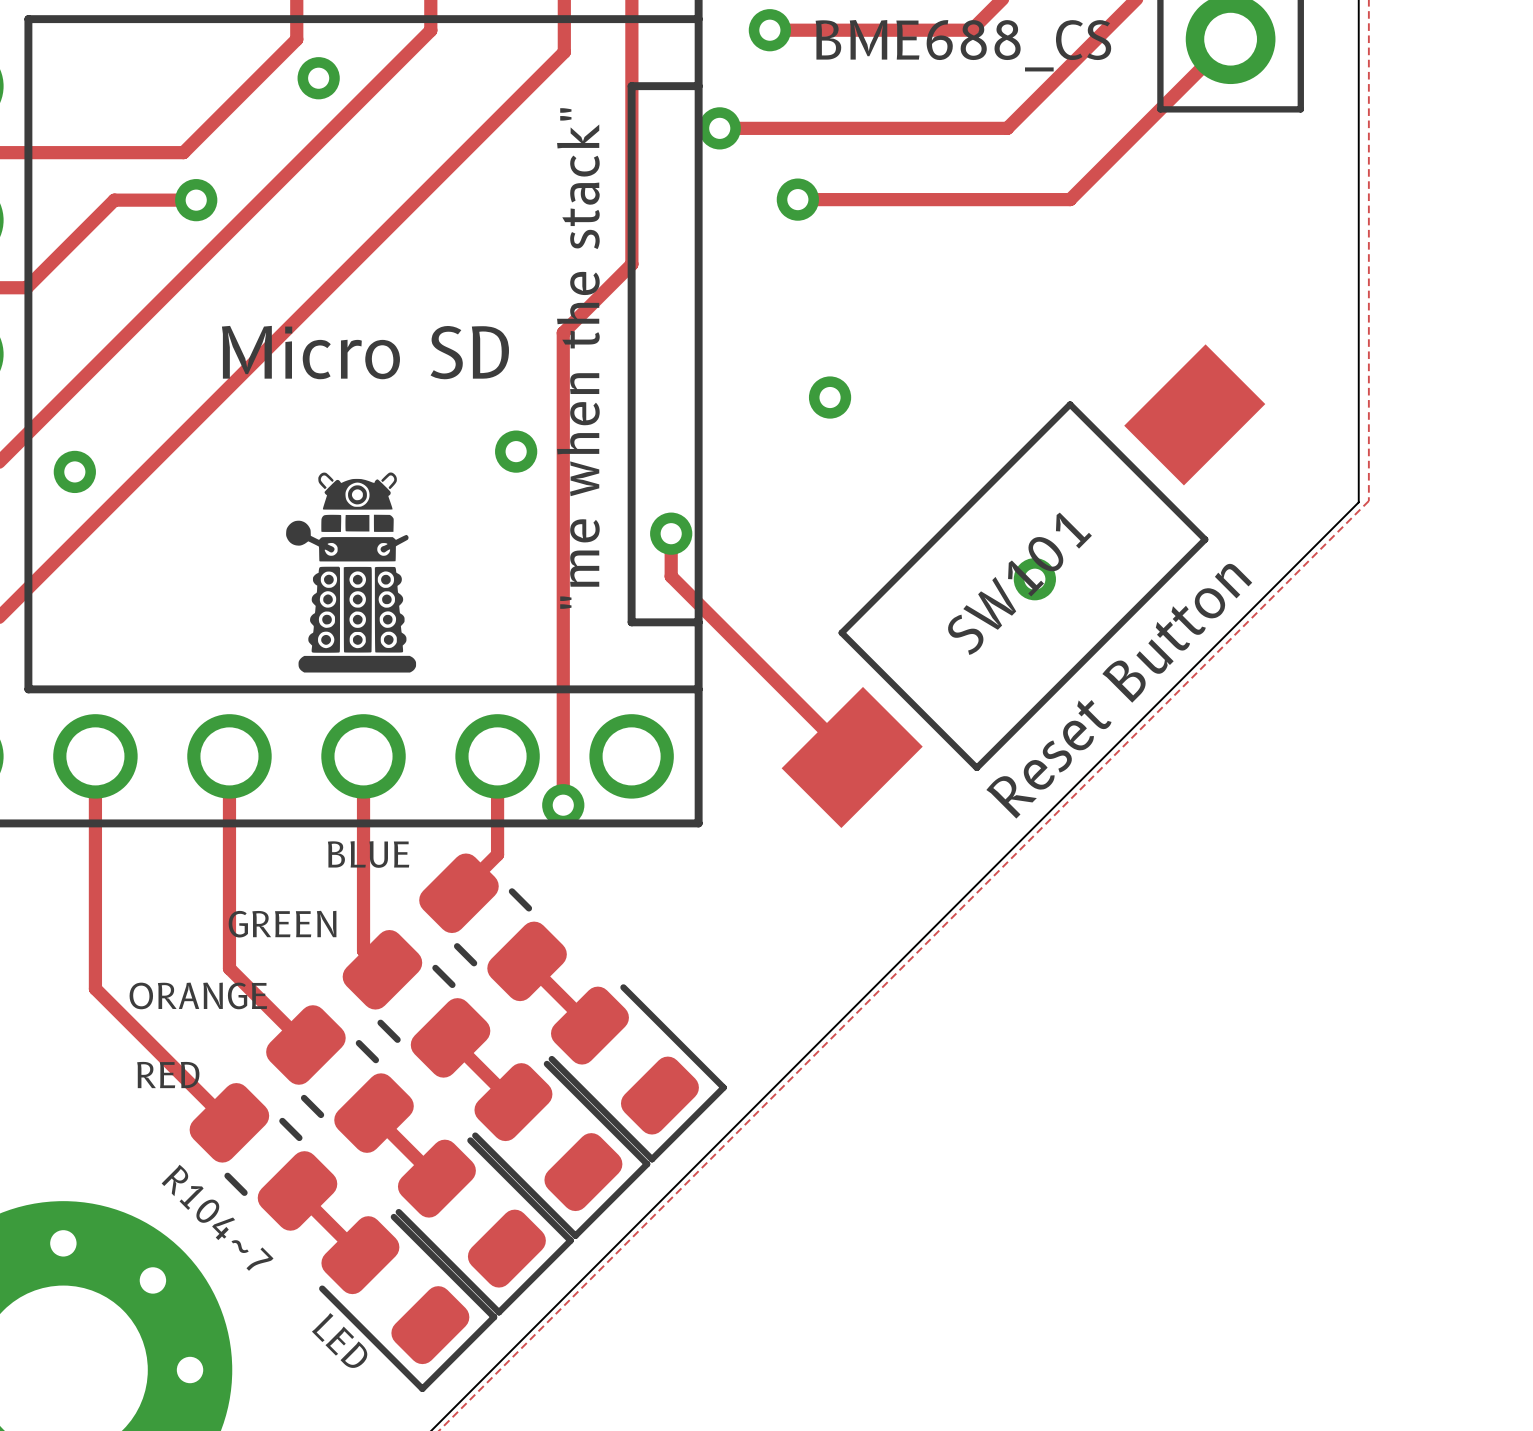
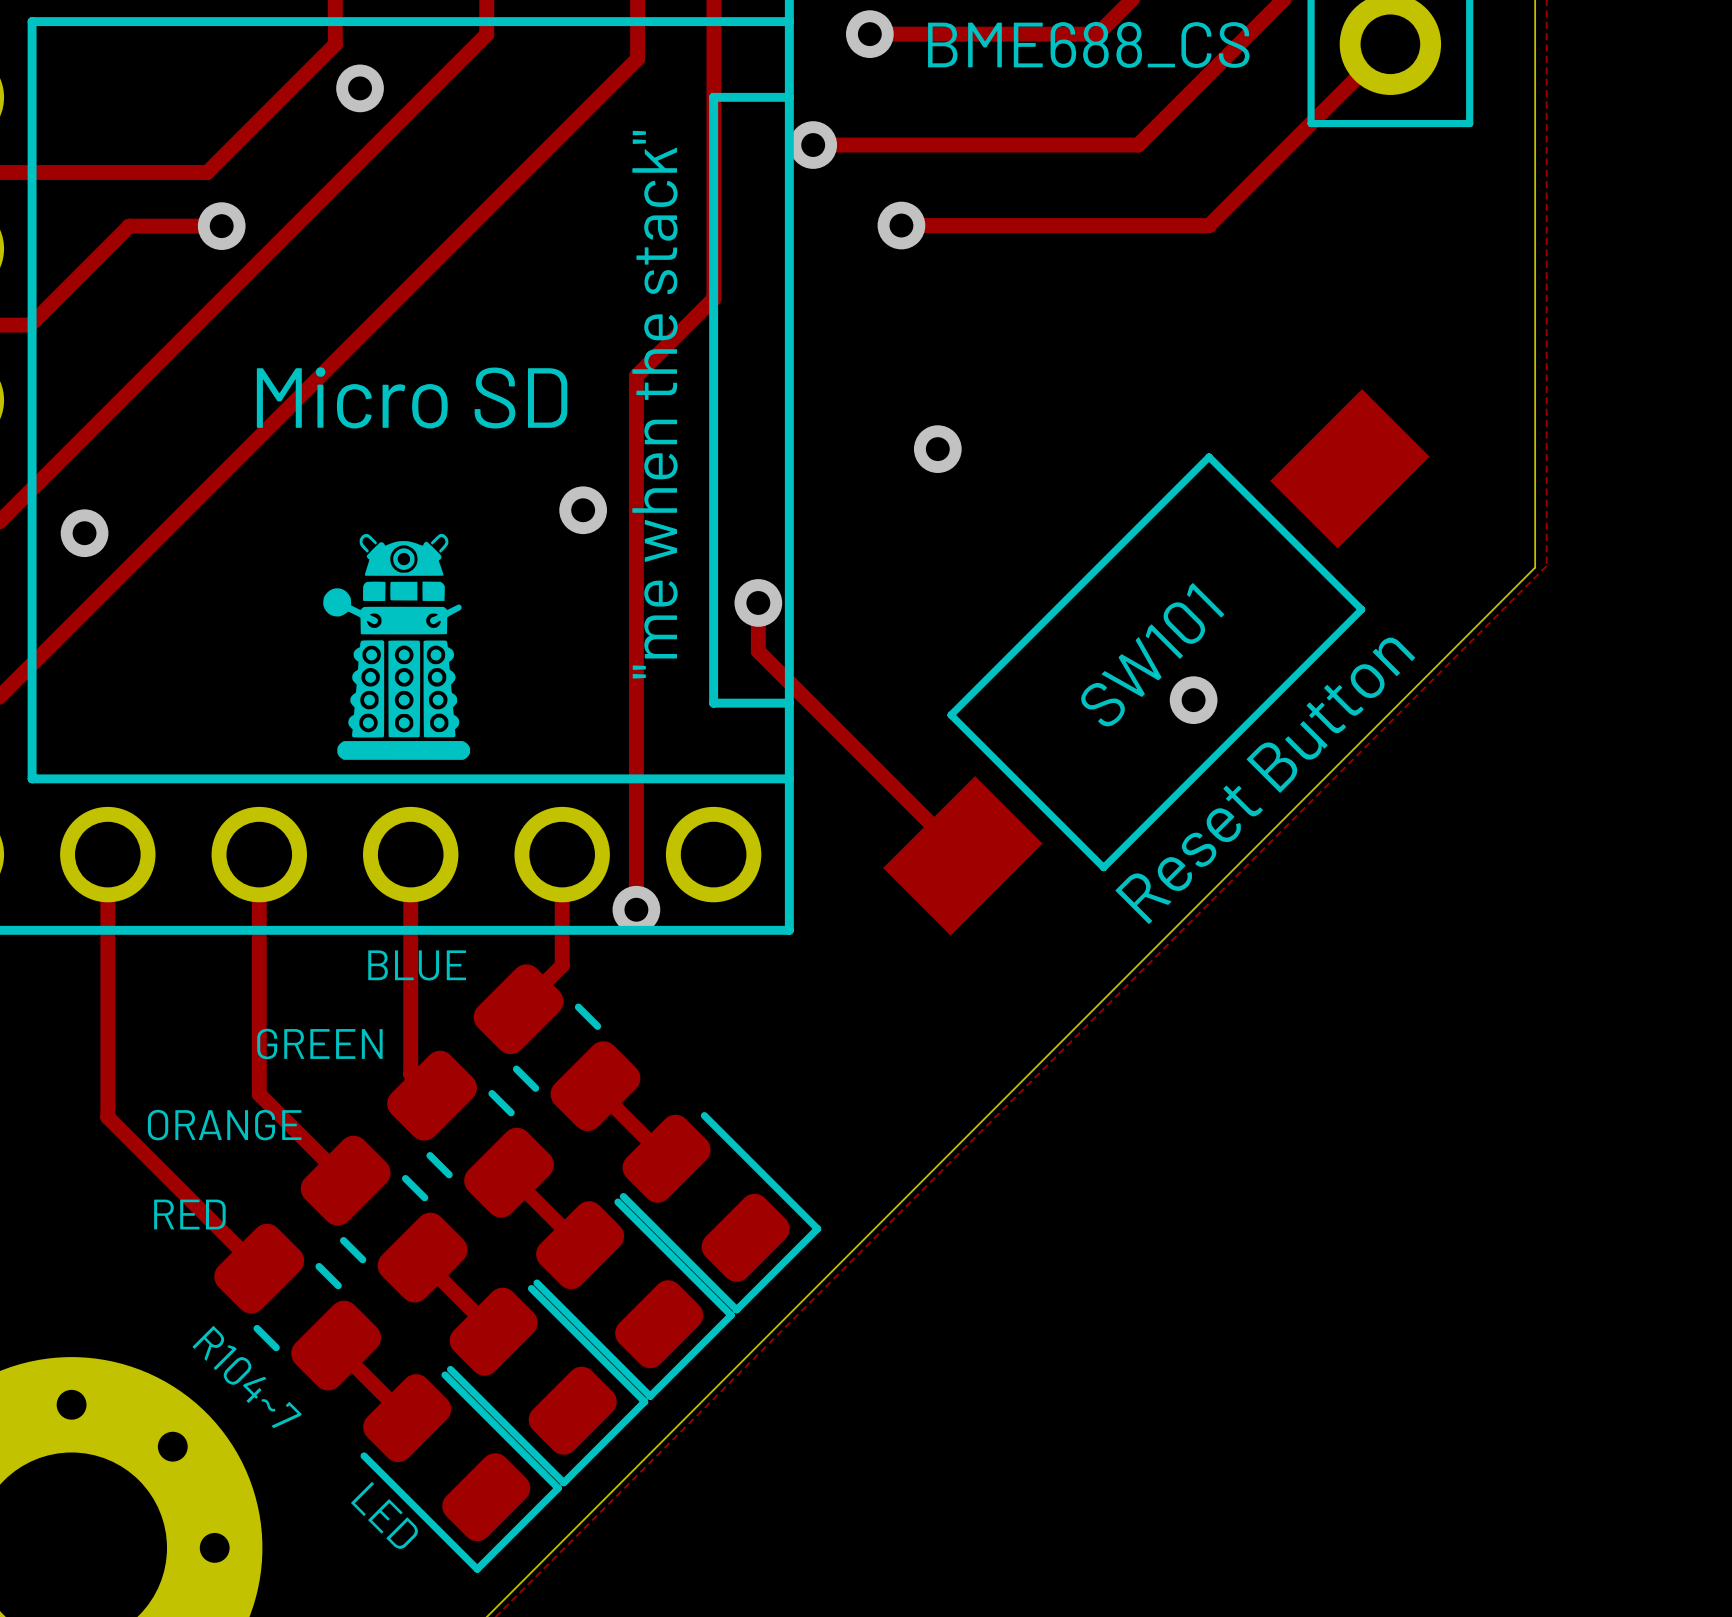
via position: (1034, 579) -> (1193, 700)

